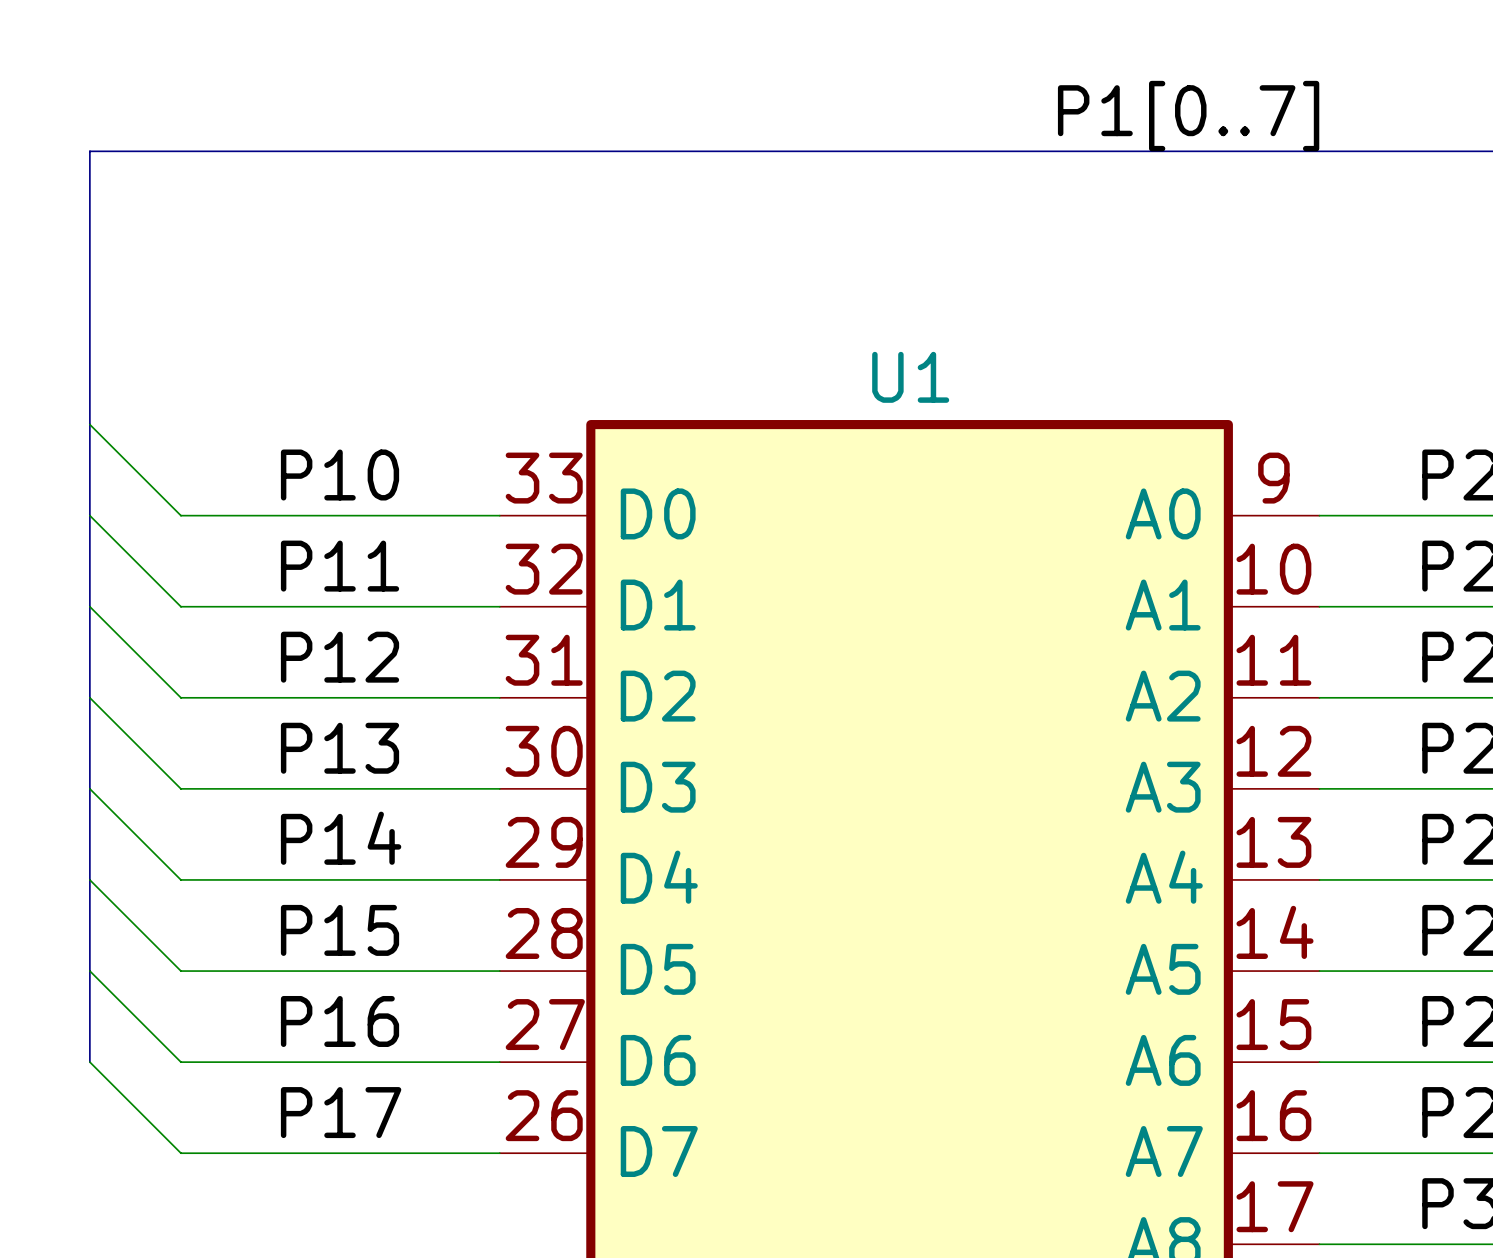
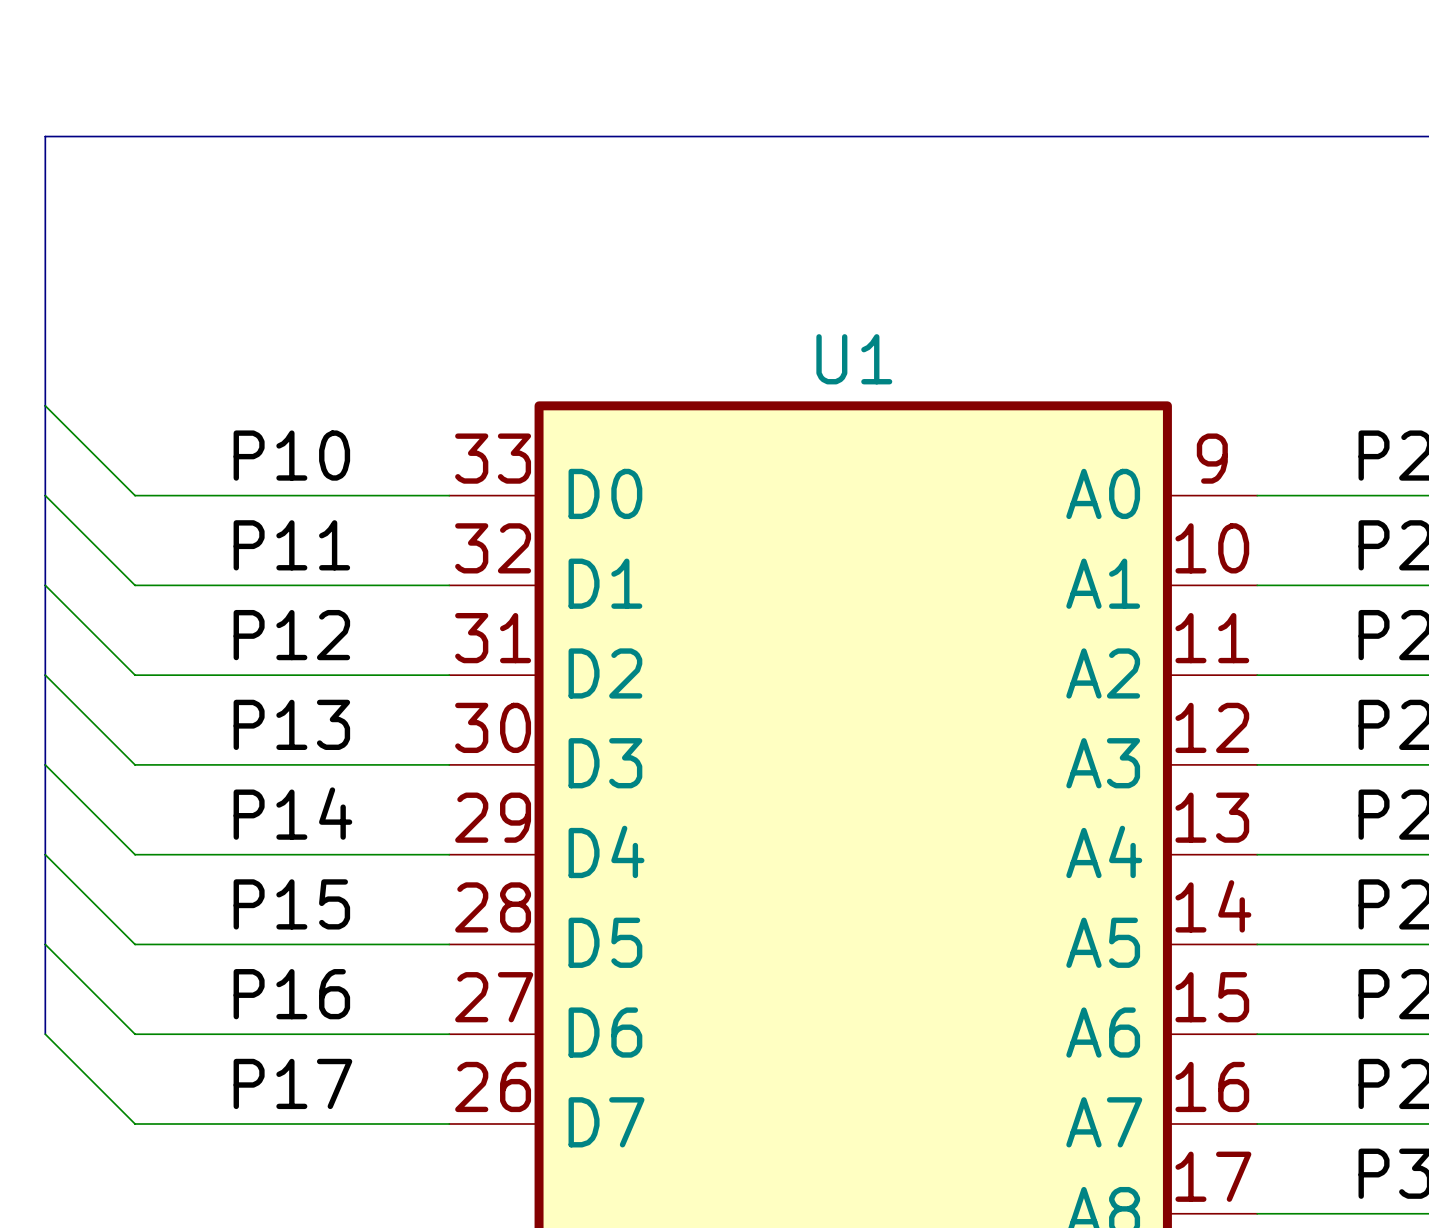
label: P1[0..7] (1188, 116) -> none

